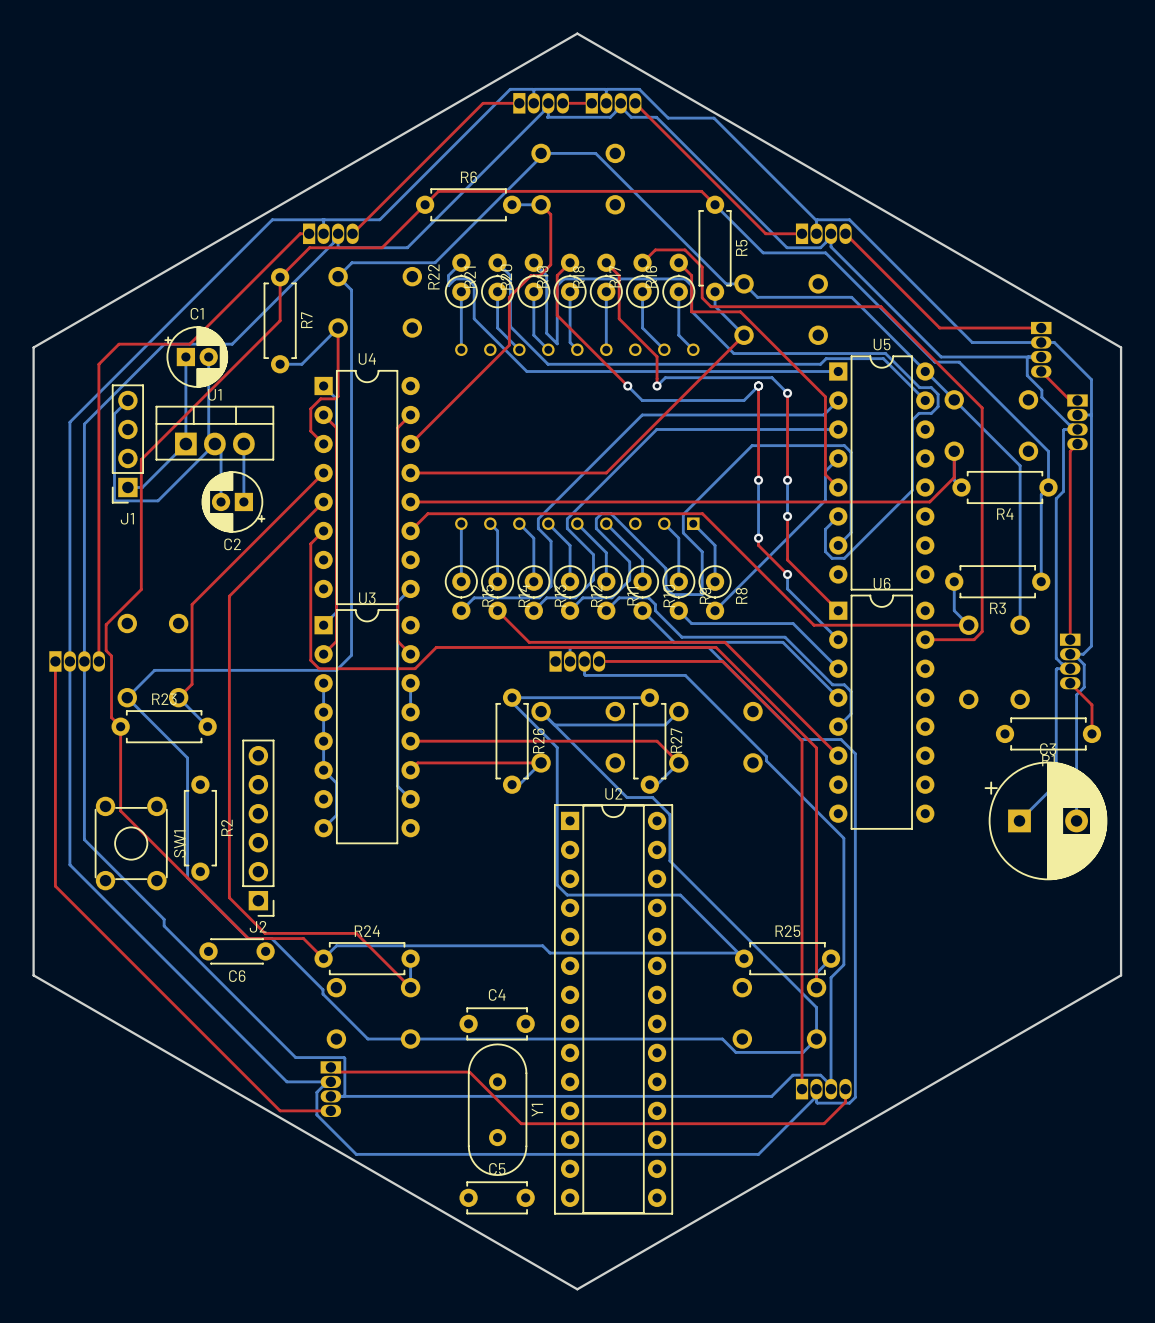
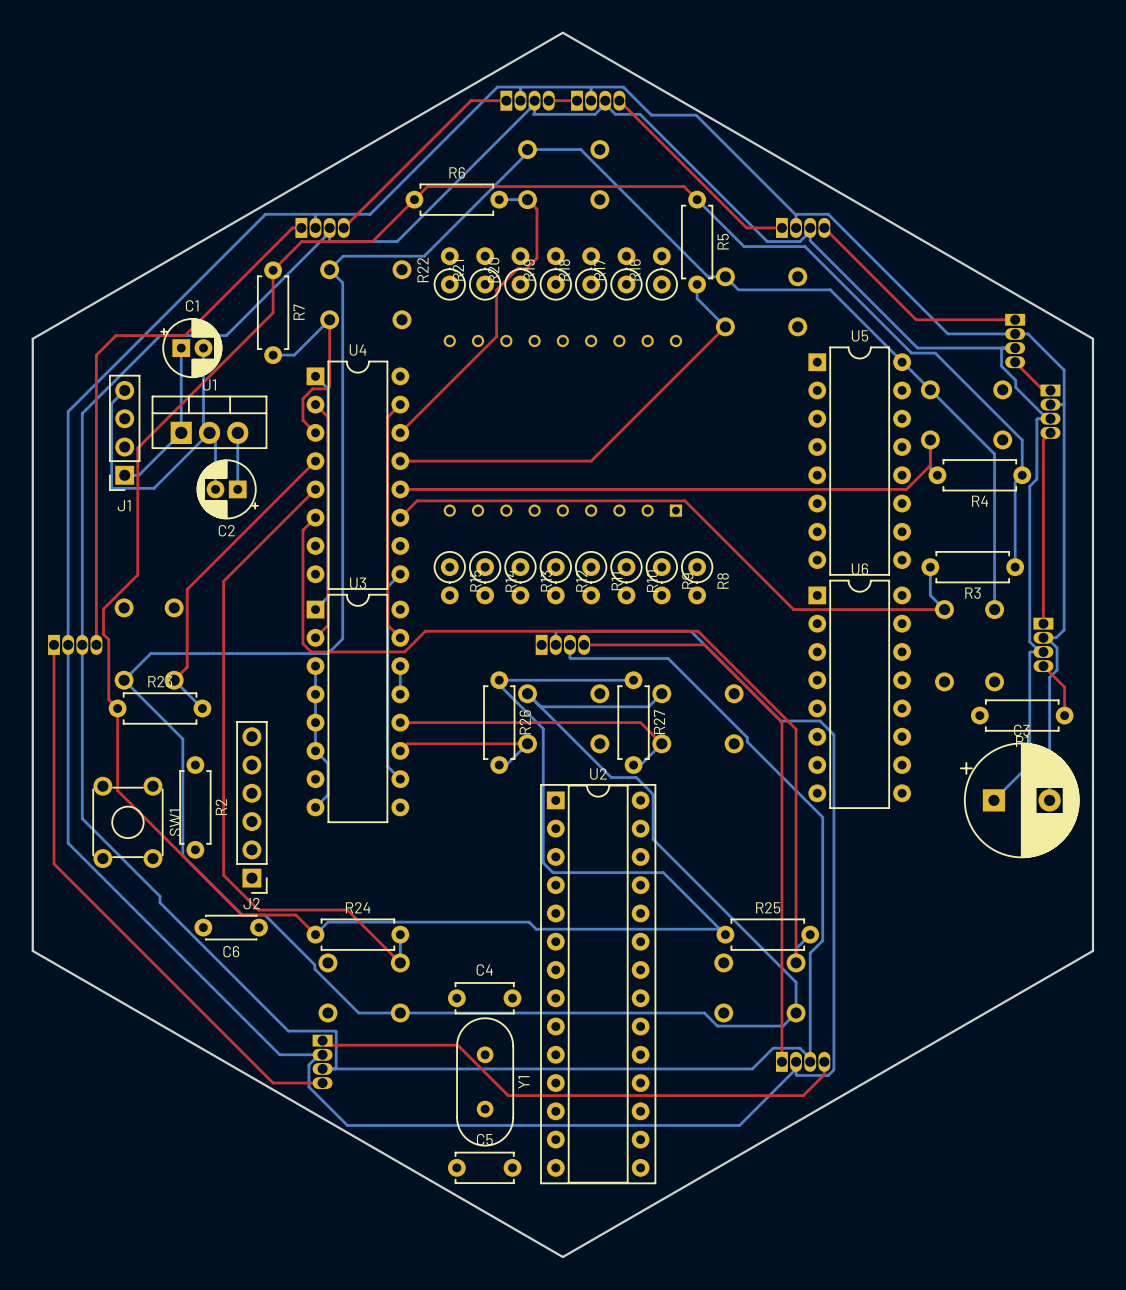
bottom track: (461, 262) (448, 275) (448, 285) (455, 278) (467, 278) (474, 285) (474, 318) (526, 371) (838, 371) -> none
bottom track: (497, 262) (510, 275) (510, 326) (548, 364) (820, 364) (826, 358) (883, 358) (925, 400) -> none
bottom track: (533, 262) (546, 275) (546, 333) (557, 343) (557, 285) (563, 278) (684, 278) (691, 285) (691, 311) (733, 353) (885, 353) (919, 387) (931, 387) (938, 394) (938, 406) (931, 413) (919, 413) (912, 420) (912, 490) (844, 558) (832, 558) (825, 551) (825, 529) (838, 516) -> none
top track: (570, 262) (557, 275) (557, 315) (627, 386) -> none
top track: (606, 262) (619, 275) (619, 318) (657, 356) (657, 386) -> none
top track: (642, 262) (655, 249) (684, 249) (702, 267) (702, 297) (711, 306) (880, 306) (982, 407) (982, 631) (974, 639) (925, 639) -> none
top track: (678, 262) (691, 275) (691, 311) (740, 311) (825, 396) (825, 474) (838, 487) -> none
bottom track: (461, 291) (461, 349) -> none
bottom track: (497, 291) (497, 328) (519, 349) -> none
bottom track: (533, 291) (533, 335) (548, 349) -> none
bottom track: (570, 291) (570, 342) (577, 349) -> none
bottom track: (606, 291) (606, 349) -> none
bottom track: (642, 291) (642, 328) (664, 349) -> none
bottom track: (678, 291) (678, 335) (693, 349) -> none
bottom track: (627, 386) (642, 400) (744, 400) (758, 386) -> none
via: (627, 386) -> none
bottom track: (657, 386) (665, 377) (772, 377) (787, 393) -> none
via: (657, 386) -> none
top track: (758, 386) (758, 480) -> none
via: (758, 386) -> none
top track: (787, 393) (787, 480) -> none
via: (787, 393) -> none
bottom track: (838, 400) (823, 415) (642, 415) (538, 518) (538, 528) (551, 541) (551, 586) (539, 597) (474, 597) (461, 610) -> none
bottom track: (838, 429) (656, 429) (567, 518) (567, 528) (593, 554) (593, 580) (575, 597) (546, 597) (533, 610) -> none
bottom track: (838, 458) (825, 471) (825, 500) (715, 610) -> none
bottom track: (758, 480) (758, 538) -> none
via: (758, 480) -> none
bottom track: (787, 480) (787, 516) -> none
via: (787, 480) -> none
top track: (787, 516) (787, 559) (838, 610) -> none
via: (787, 516) -> none
bottom track: (461, 523) (461, 581) -> none
bottom track: (490, 523) (497, 530) (497, 581) -> none
bottom track: (519, 523) (533, 538) (533, 581) -> none
bottom track: (548, 523) (570, 545) (570, 581) -> none
bottom track: (577, 523) (606, 552) (606, 581) -> none
bottom track: (606, 523) (642, 559) (642, 581) -> none
bottom track: (664, 523) (678, 538) (678, 581) -> none
bottom track: (693, 523) (715, 545) (715, 581) -> none
top track: (758, 538) (758, 545) (787, 574) -> none
via: (758, 538) -> none
bottom track: (838, 545) (851, 532) (851, 452) (844, 445) (752, 445) (683, 514) (683, 532) (702, 551) (702, 594) (672, 594) (665, 587) (665, 568) (611, 513) (601, 513) (596, 518) (596, 528) (629, 561) (629, 580) (611, 597) (582, 597) (570, 610) -> none
bottom track: (787, 574) (787, 588) (838, 639) -> none
via: (787, 574) -> none
top track: (497, 610) (529, 642) (724, 642) (838, 755) -> none
bottom track: (606, 610) (619, 597) (648, 597) (655, 604) (655, 610) (681, 637) (785, 637) (832, 684) (844, 684) (851, 691) (851, 713) (838, 726) -> none
bottom track: (642, 610) (674, 642) (782, 642) (838, 697) -> none
bottom track: (678, 610) (691, 623) (793, 623) (838, 668) -> none

